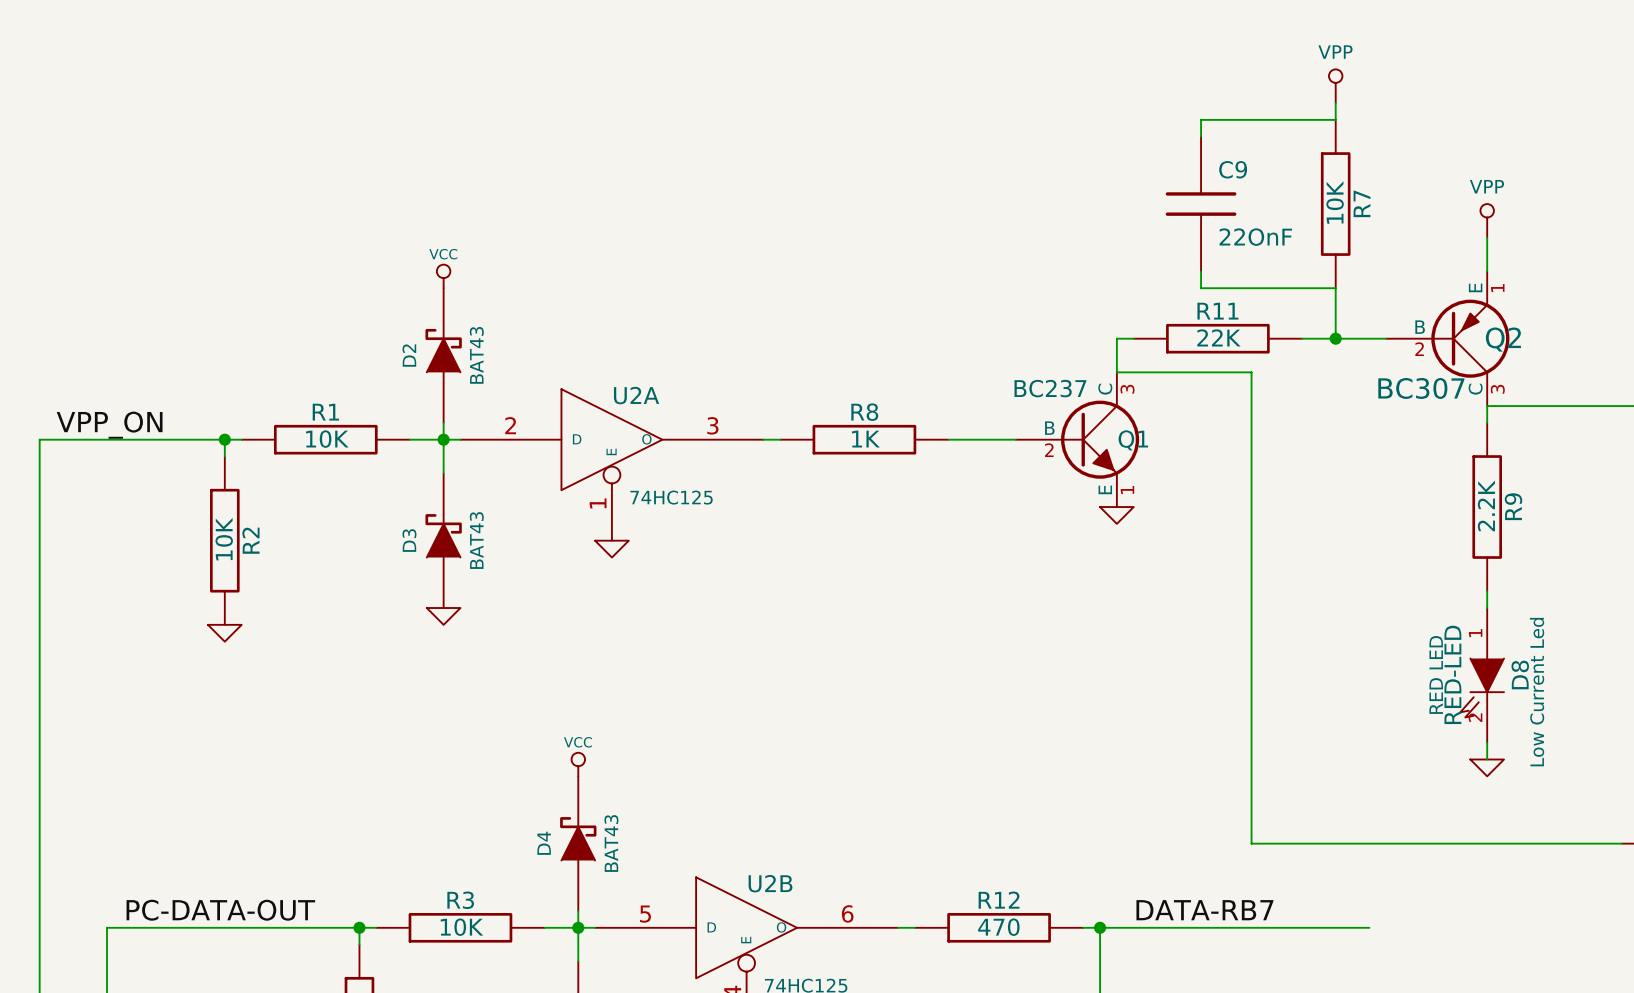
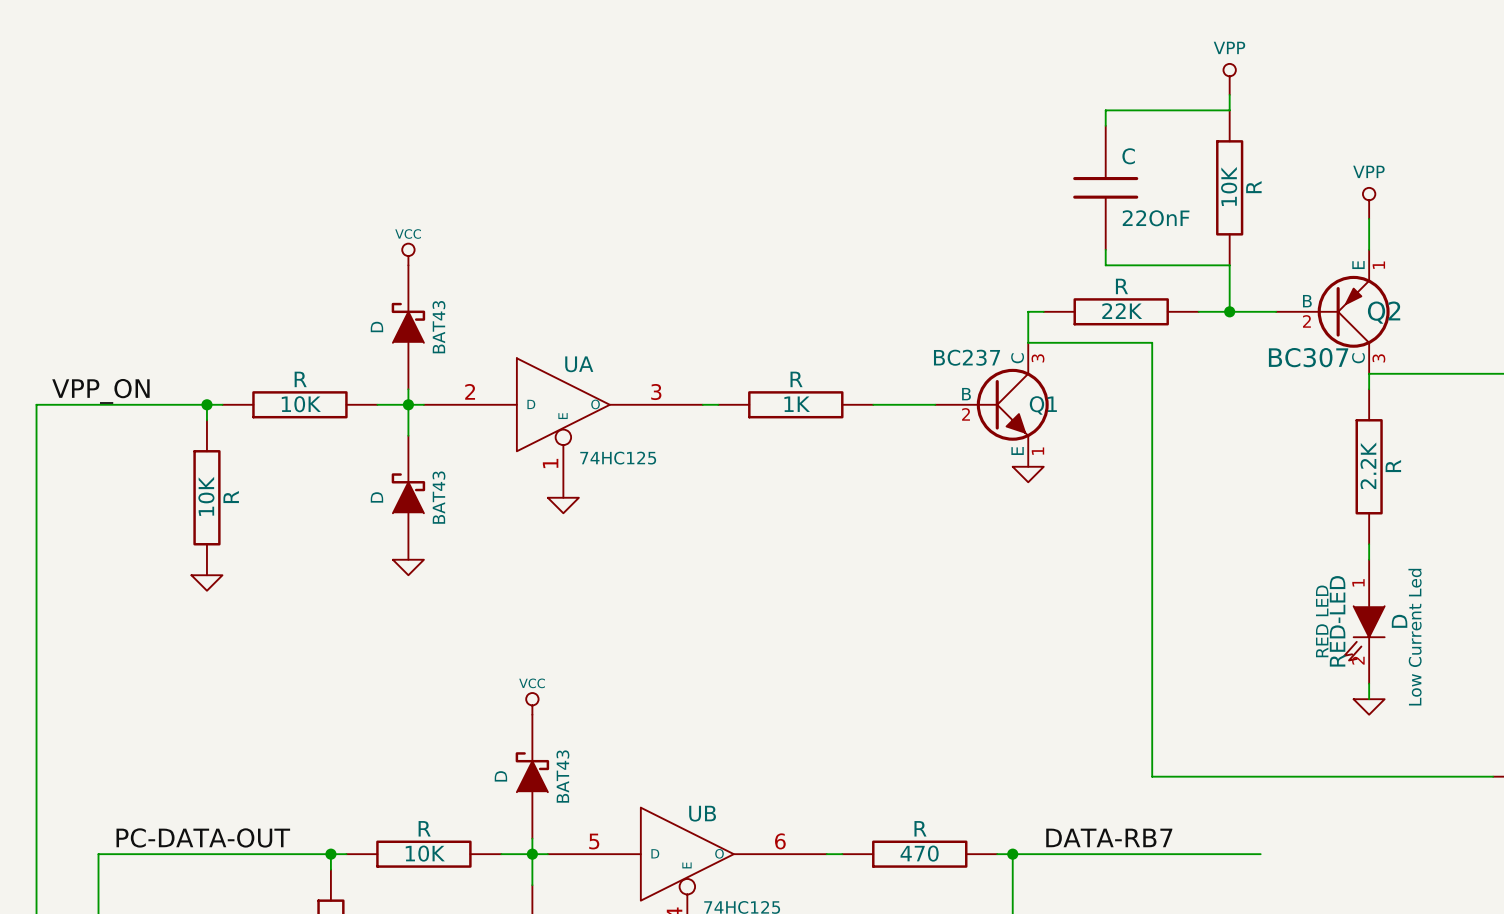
C9 name: C9 (1233, 169) -> C (1128, 156)
R7 name: R7 (1362, 203) -> R (1253, 187)
R11 name: R11 (1217, 311) -> R (1121, 286)
D2 name: D2 (409, 355) -> D (376, 326)
U2A name: U2A (636, 395) -> UA (579, 364)
R1 name: R1 (325, 412) -> R (300, 379)
R8 name: R8 (864, 412) -> R (796, 379)
R9 name: R9 (1513, 506) -> R (1393, 466)
R2 name: R2 (250, 540) -> R (231, 497)
D3 name: D3 (409, 540) -> D (376, 497)
D8 name: D8 (1520, 674) -> D (1399, 621)
D4 name: D4 (544, 843) -> D (500, 776)
U2B name: U2B (770, 883) -> UB (702, 813)
R3 name: R3 (460, 900) -> R (424, 828)
R12 name: R12 (999, 900) -> R (920, 828)

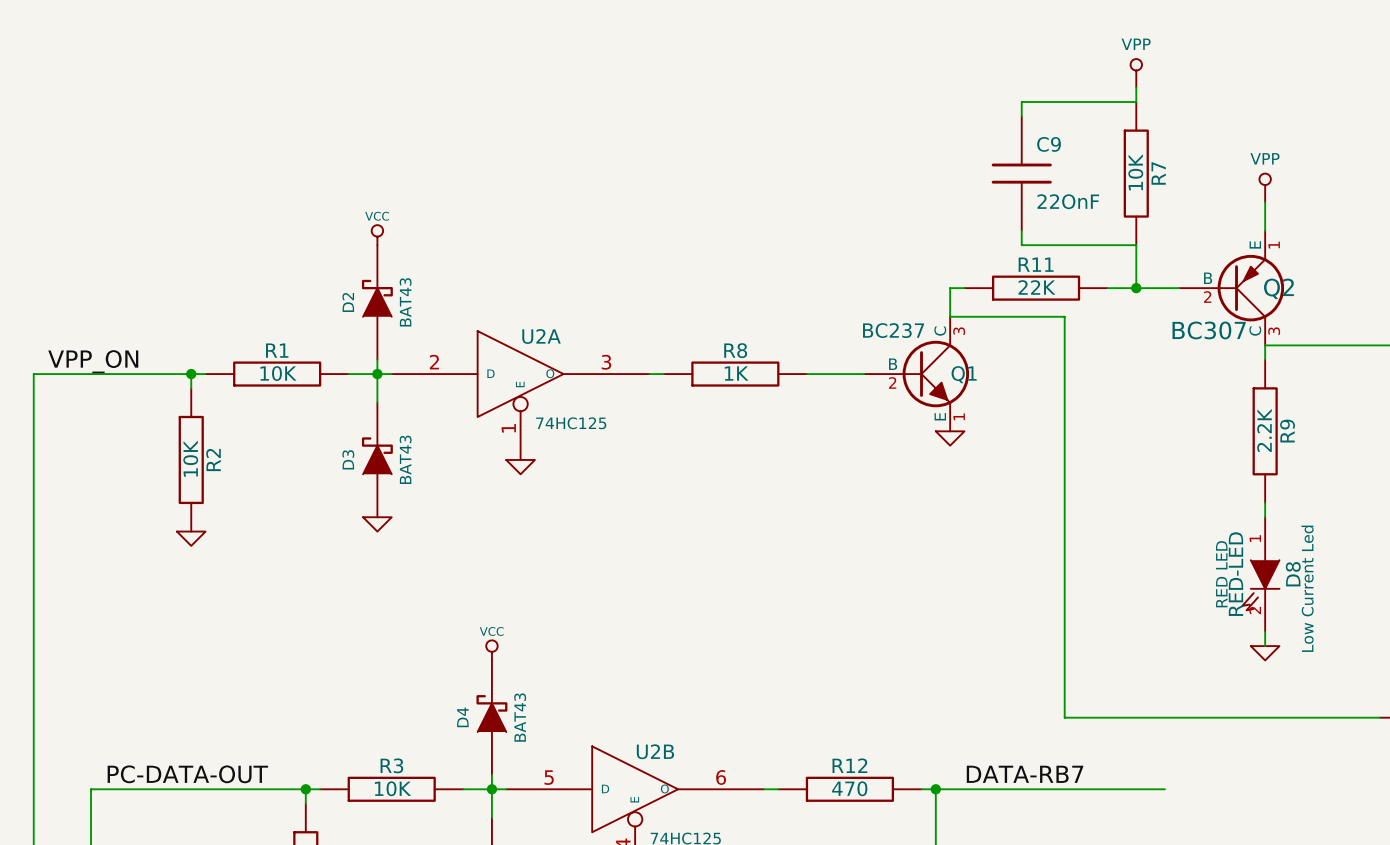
C name: C (1128, 156) -> C9 (1049, 144)
R name: R (1253, 187) -> R7 (1158, 173)
R name: R (1121, 286) -> R11 (1036, 264)
D name: D (376, 326) -> D2 (348, 302)
UA name: UA (579, 364) -> U2A (541, 336)
R name: R (300, 379) -> R1 (277, 350)
R name: R (796, 379) -> R8 (735, 350)
R name: R (1393, 466) -> R9 (1287, 431)
R name: R (231, 497) -> R2 (213, 459)
D name: D (376, 497) -> D3 (348, 459)
D name: D (1399, 621) -> D8 (1293, 574)
D name: D (500, 776) -> D4 (462, 717)
UB name: UB (702, 813) -> U2B (655, 751)
R name: R (424, 828) -> R3 (391, 765)
R name: R (920, 828) -> R12 (849, 765)

